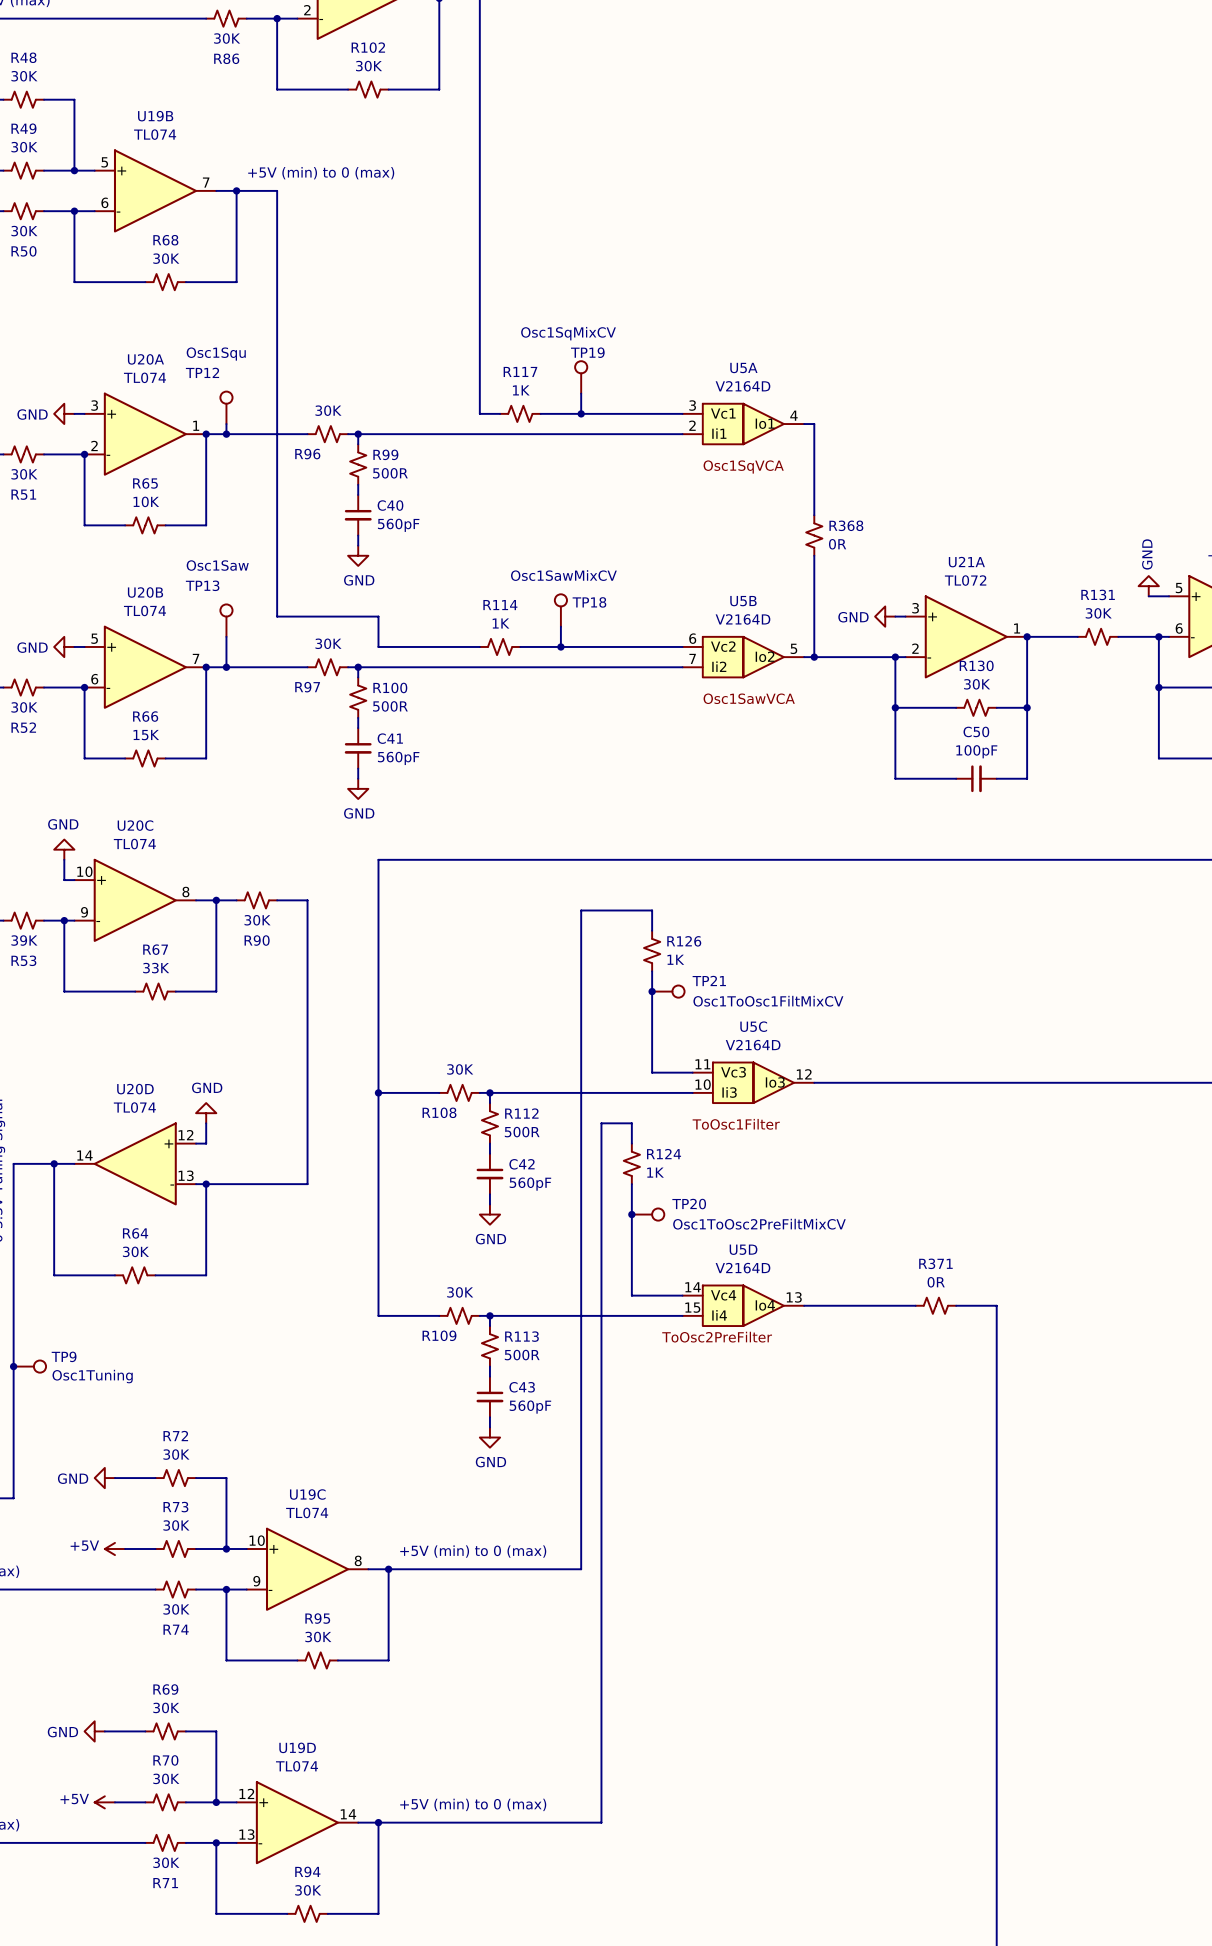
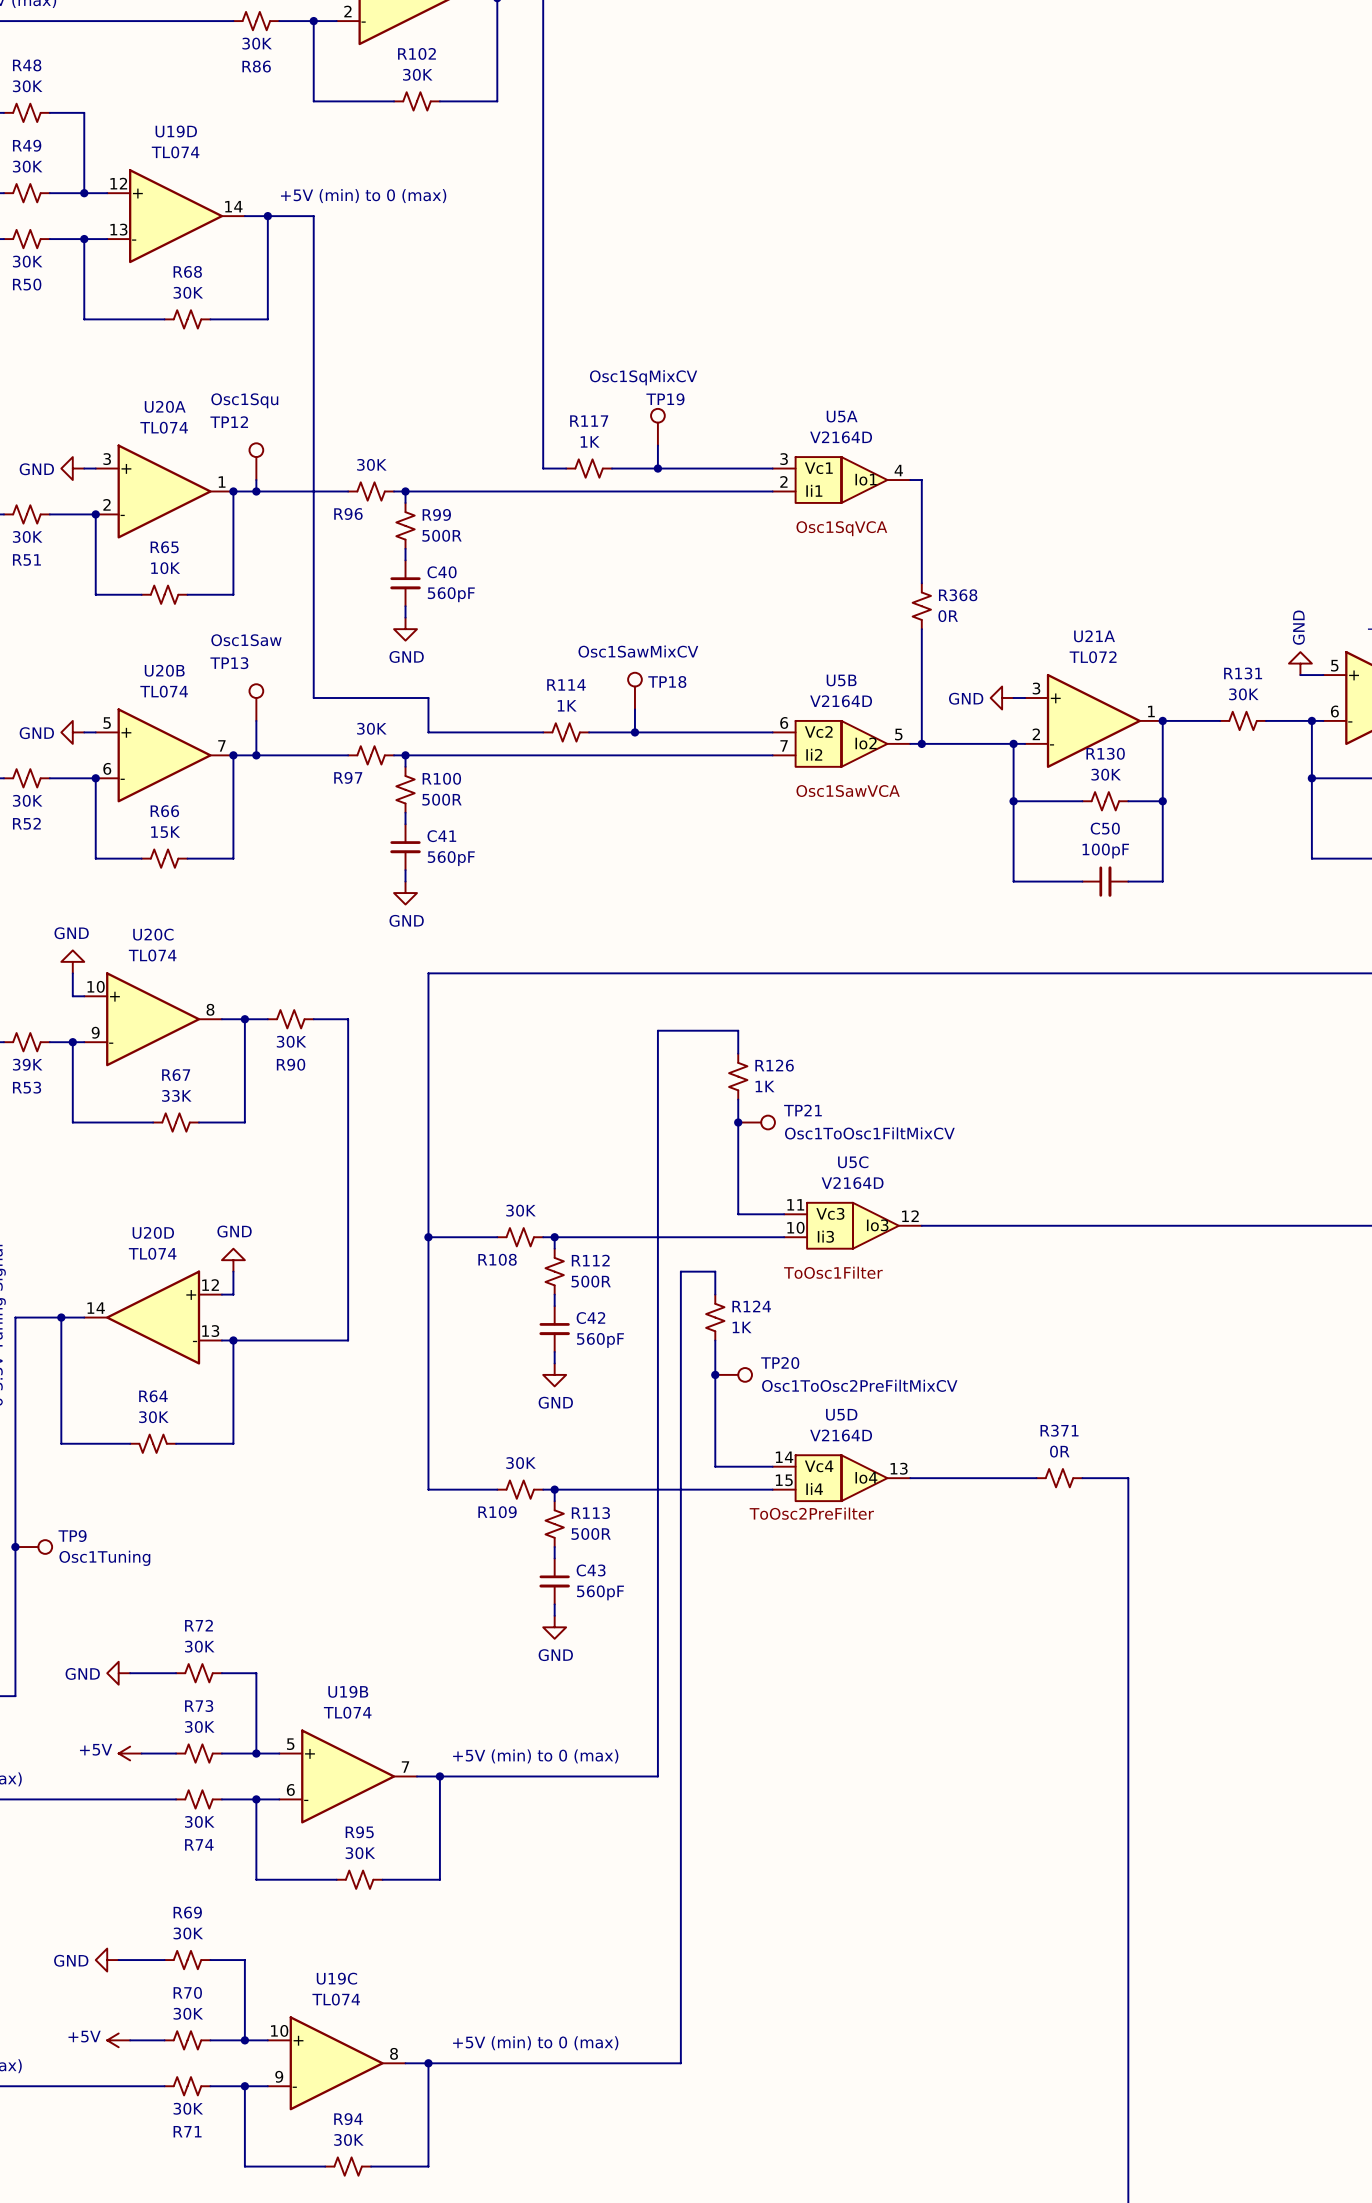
U19B position: (155, 190) -> (348, 1776)
U19C position: (307, 1569) -> (336, 2063)
U19D position: (297, 1822) -> (176, 216)

